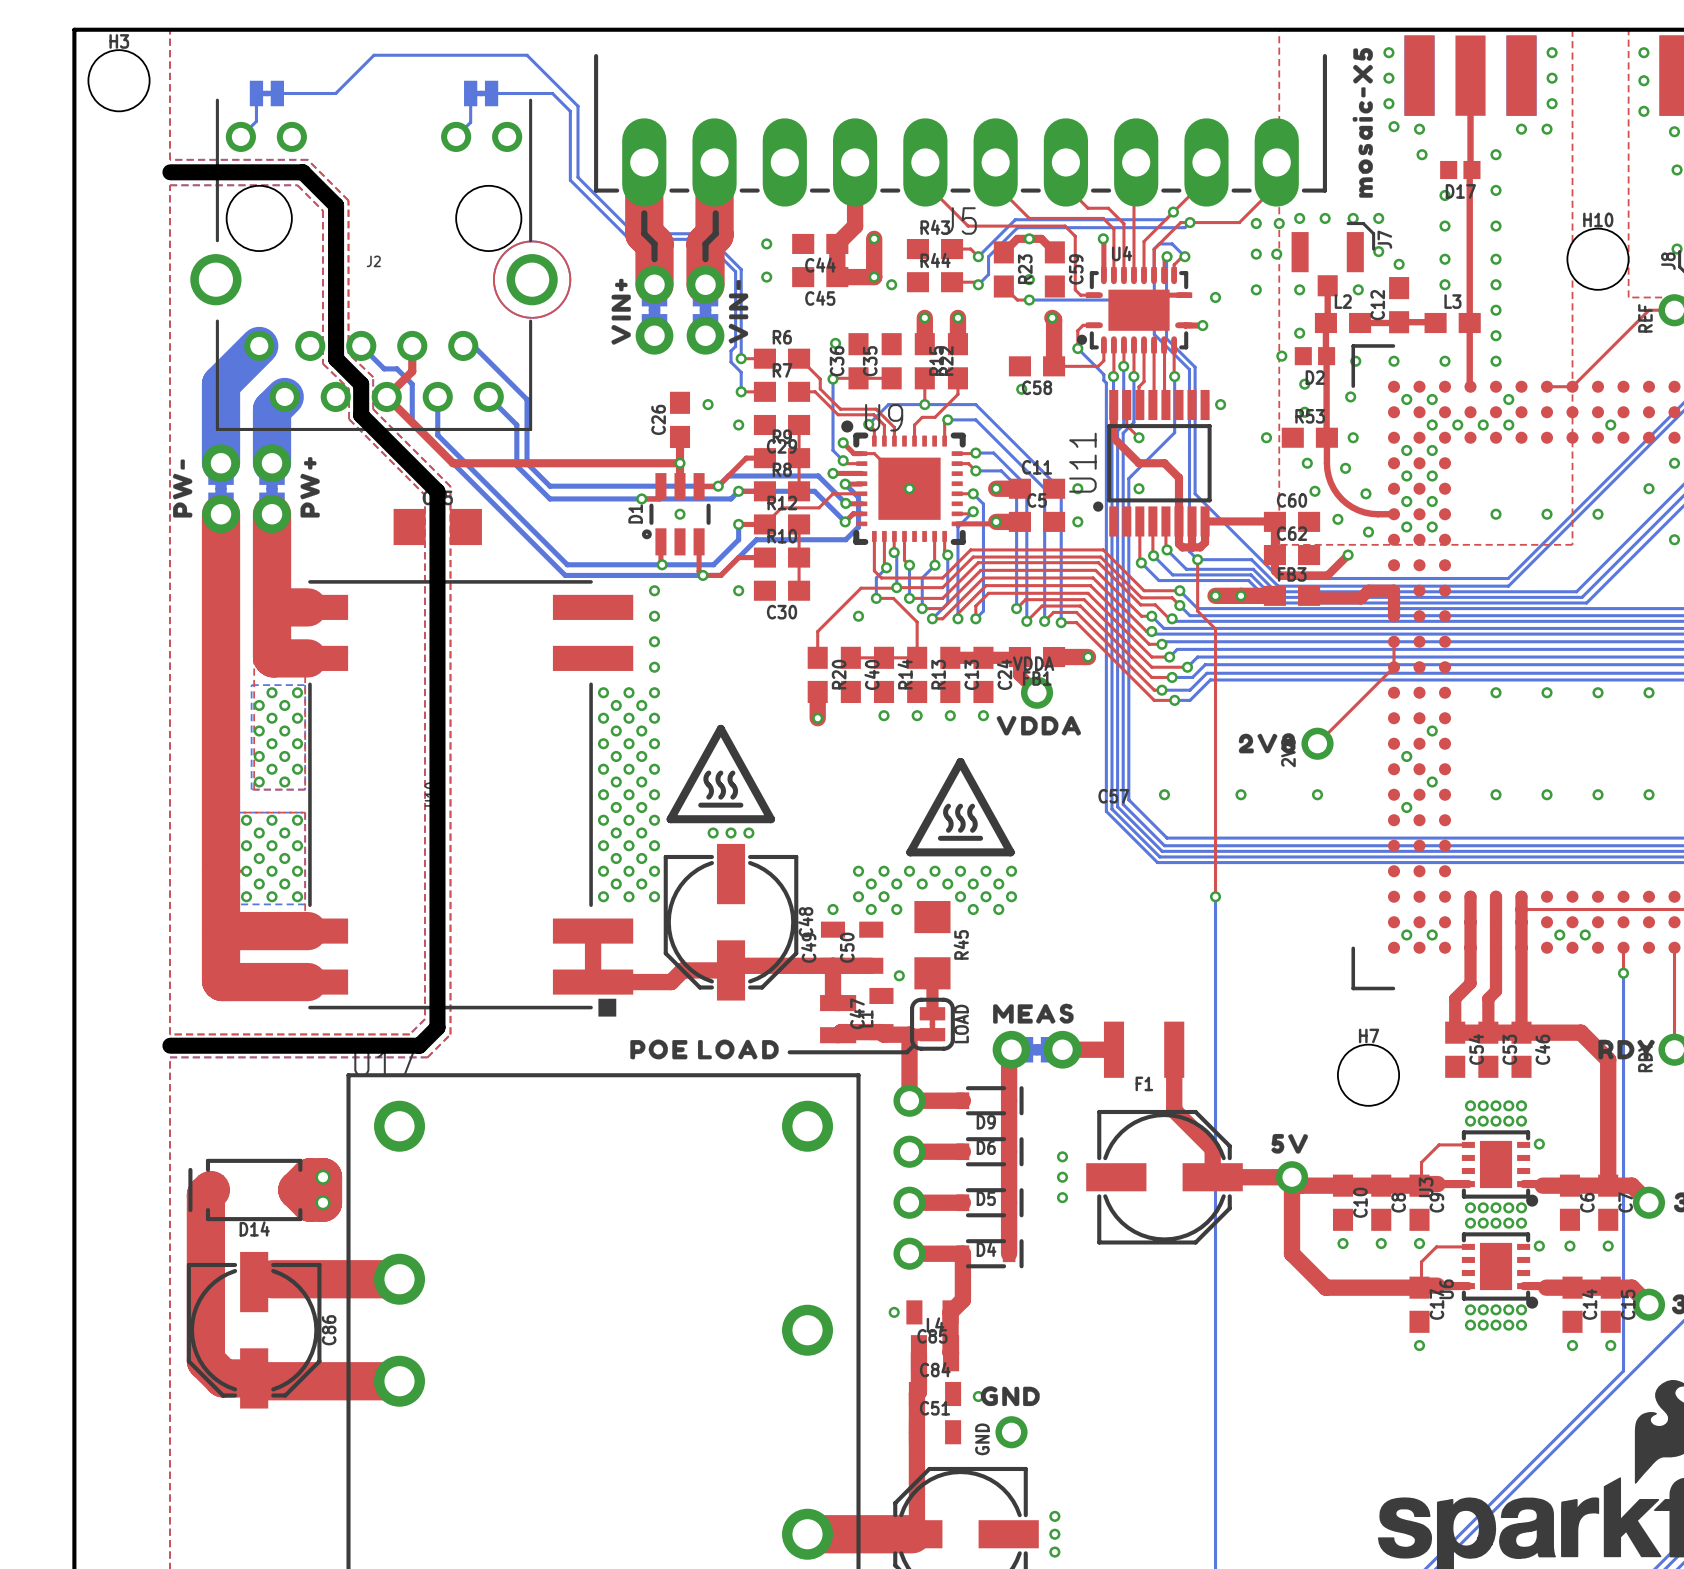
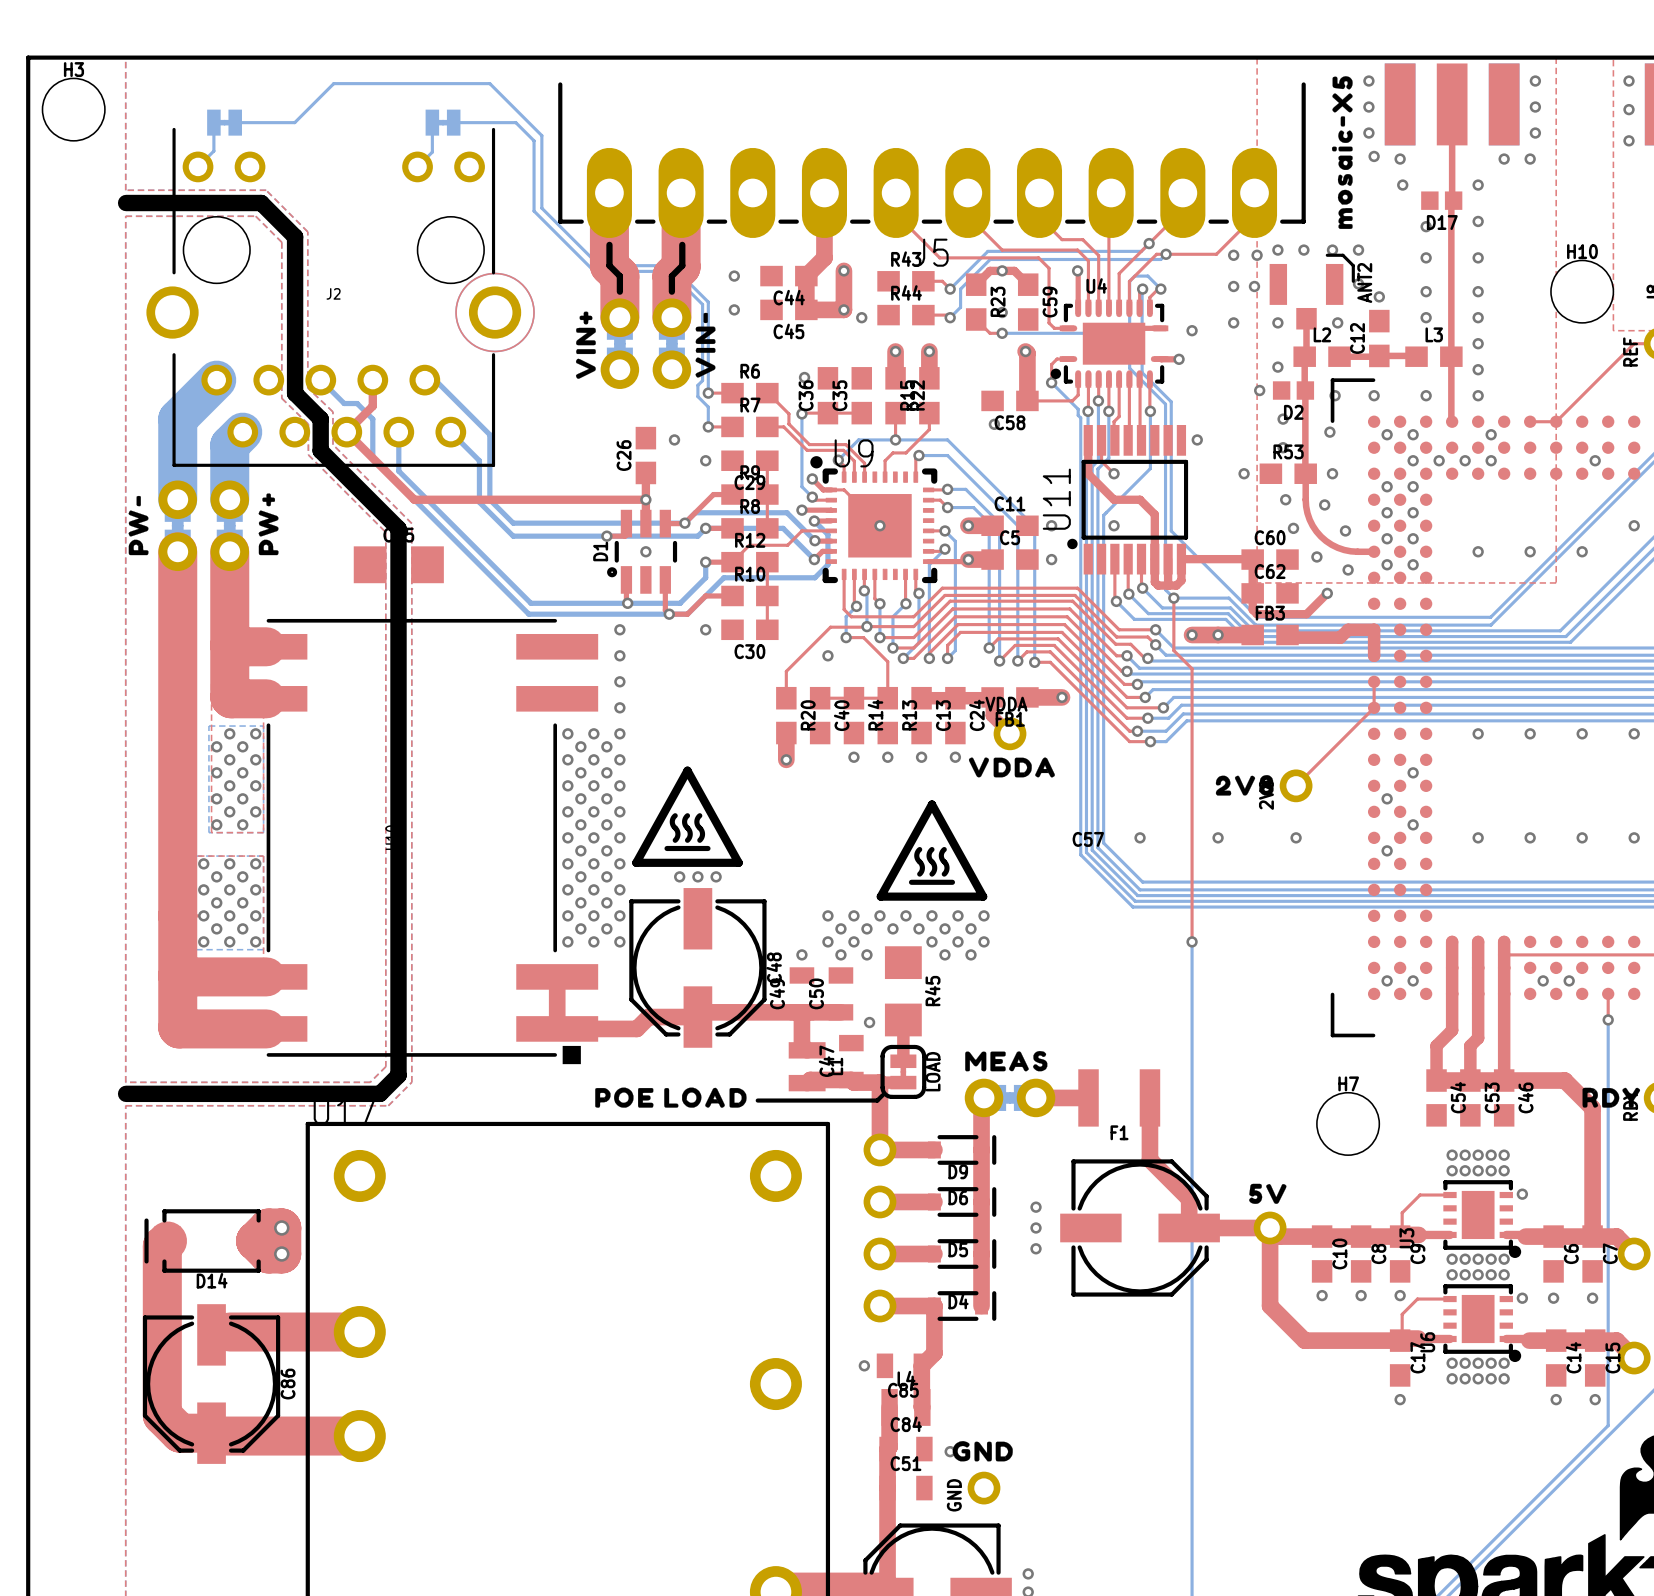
J7 name: J7 (1384, 239) -> ANT2 (1364, 282)

